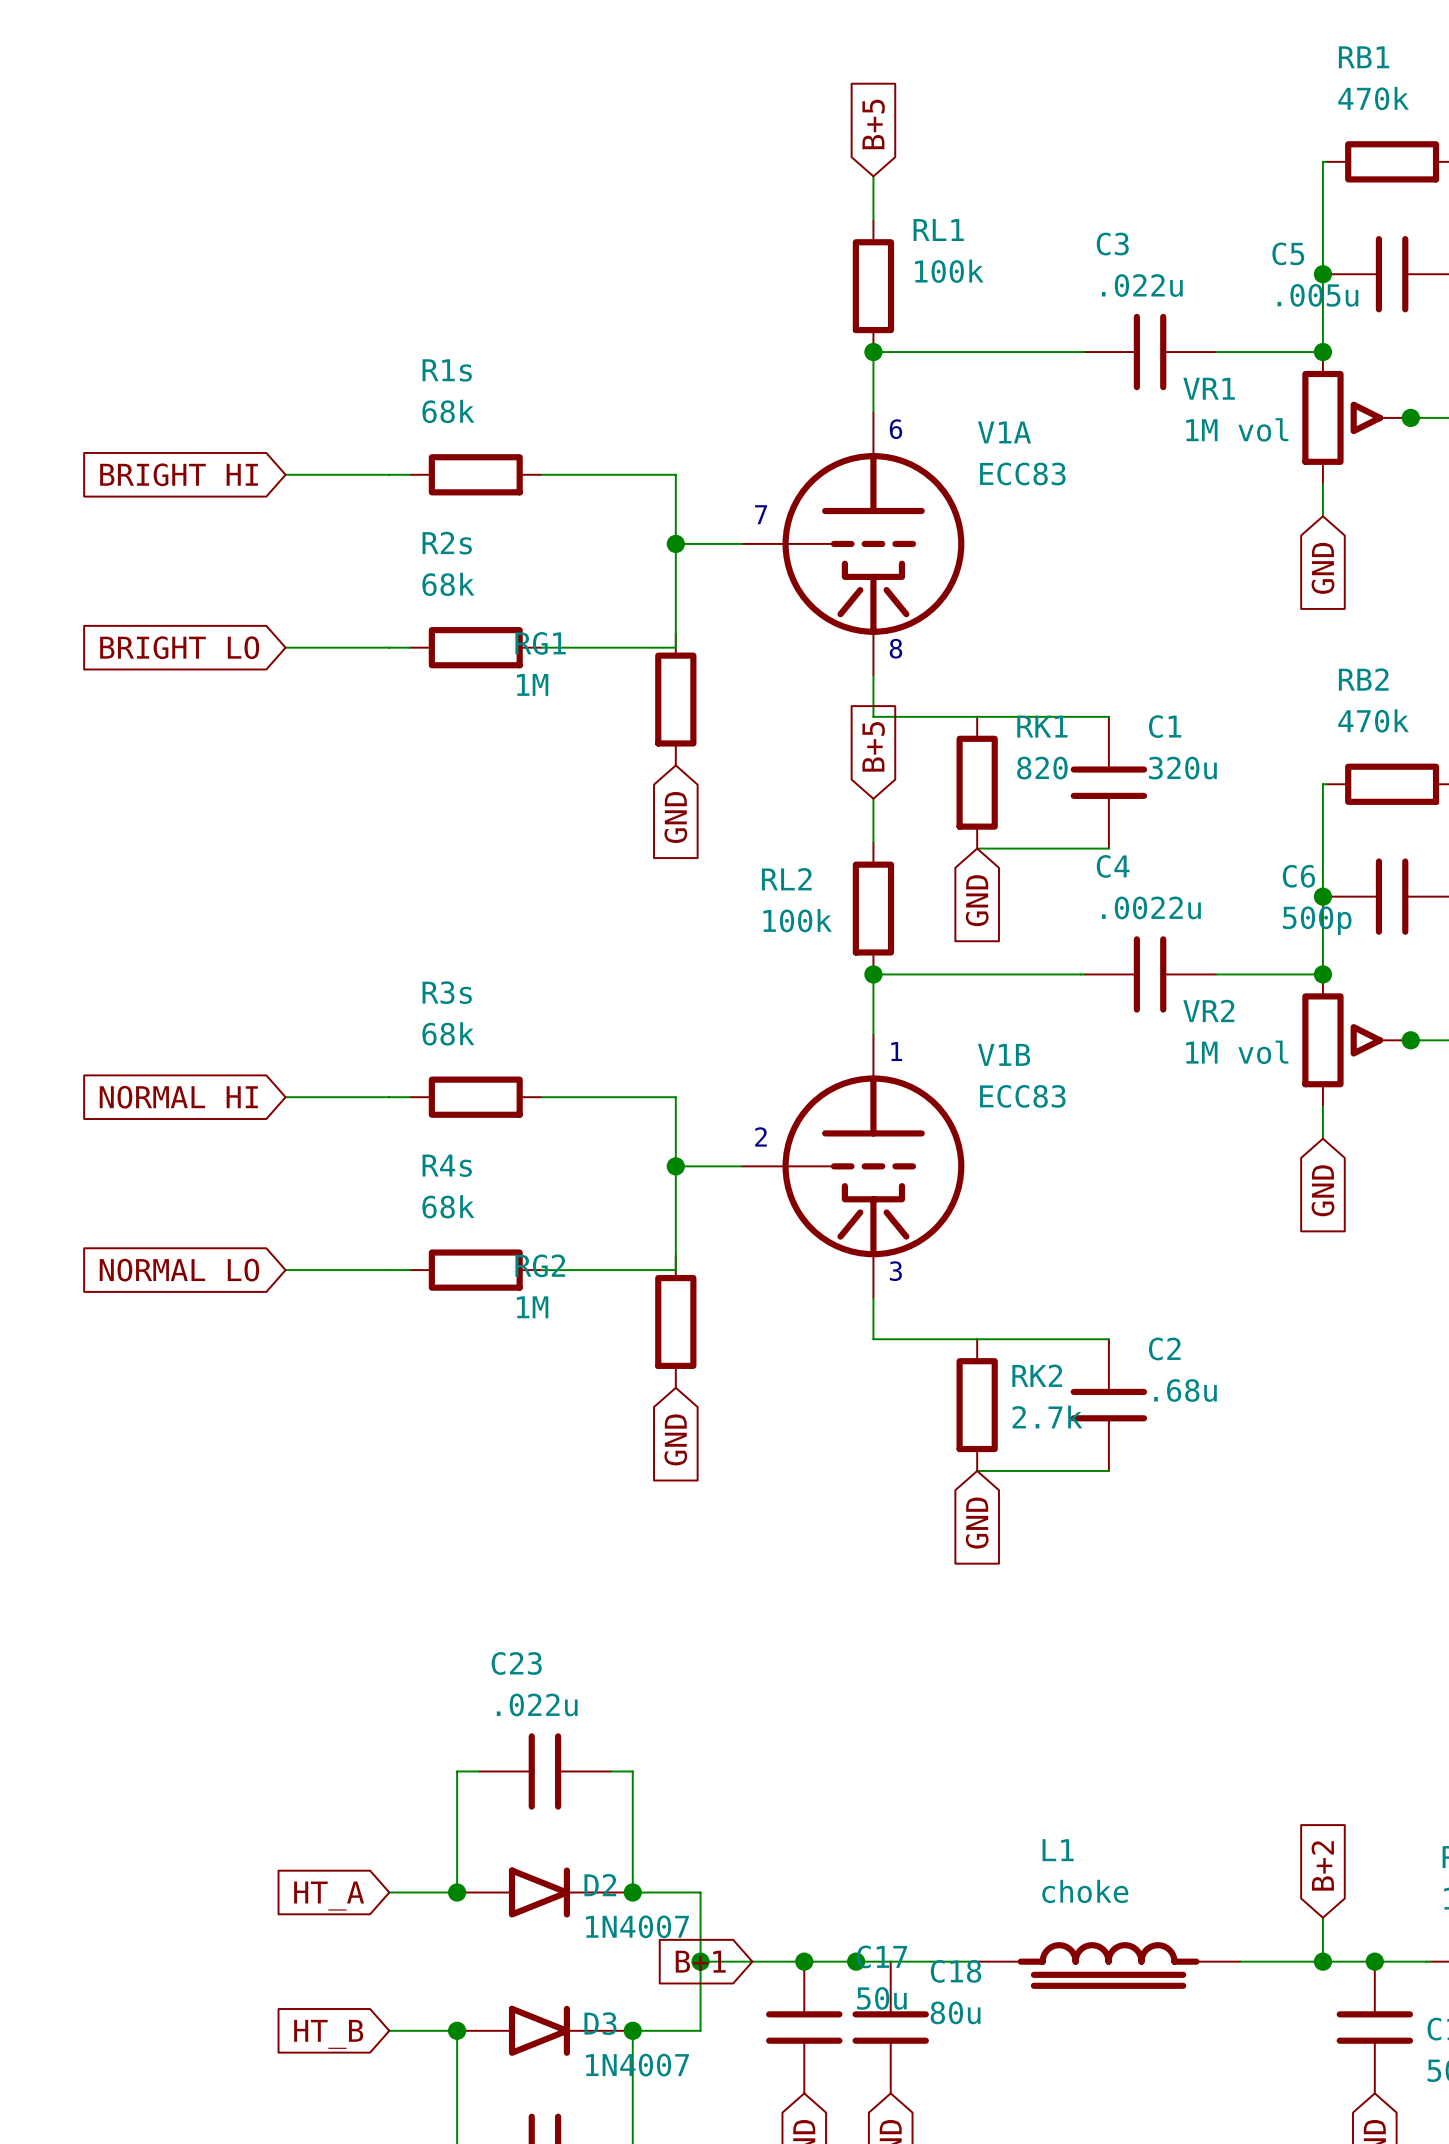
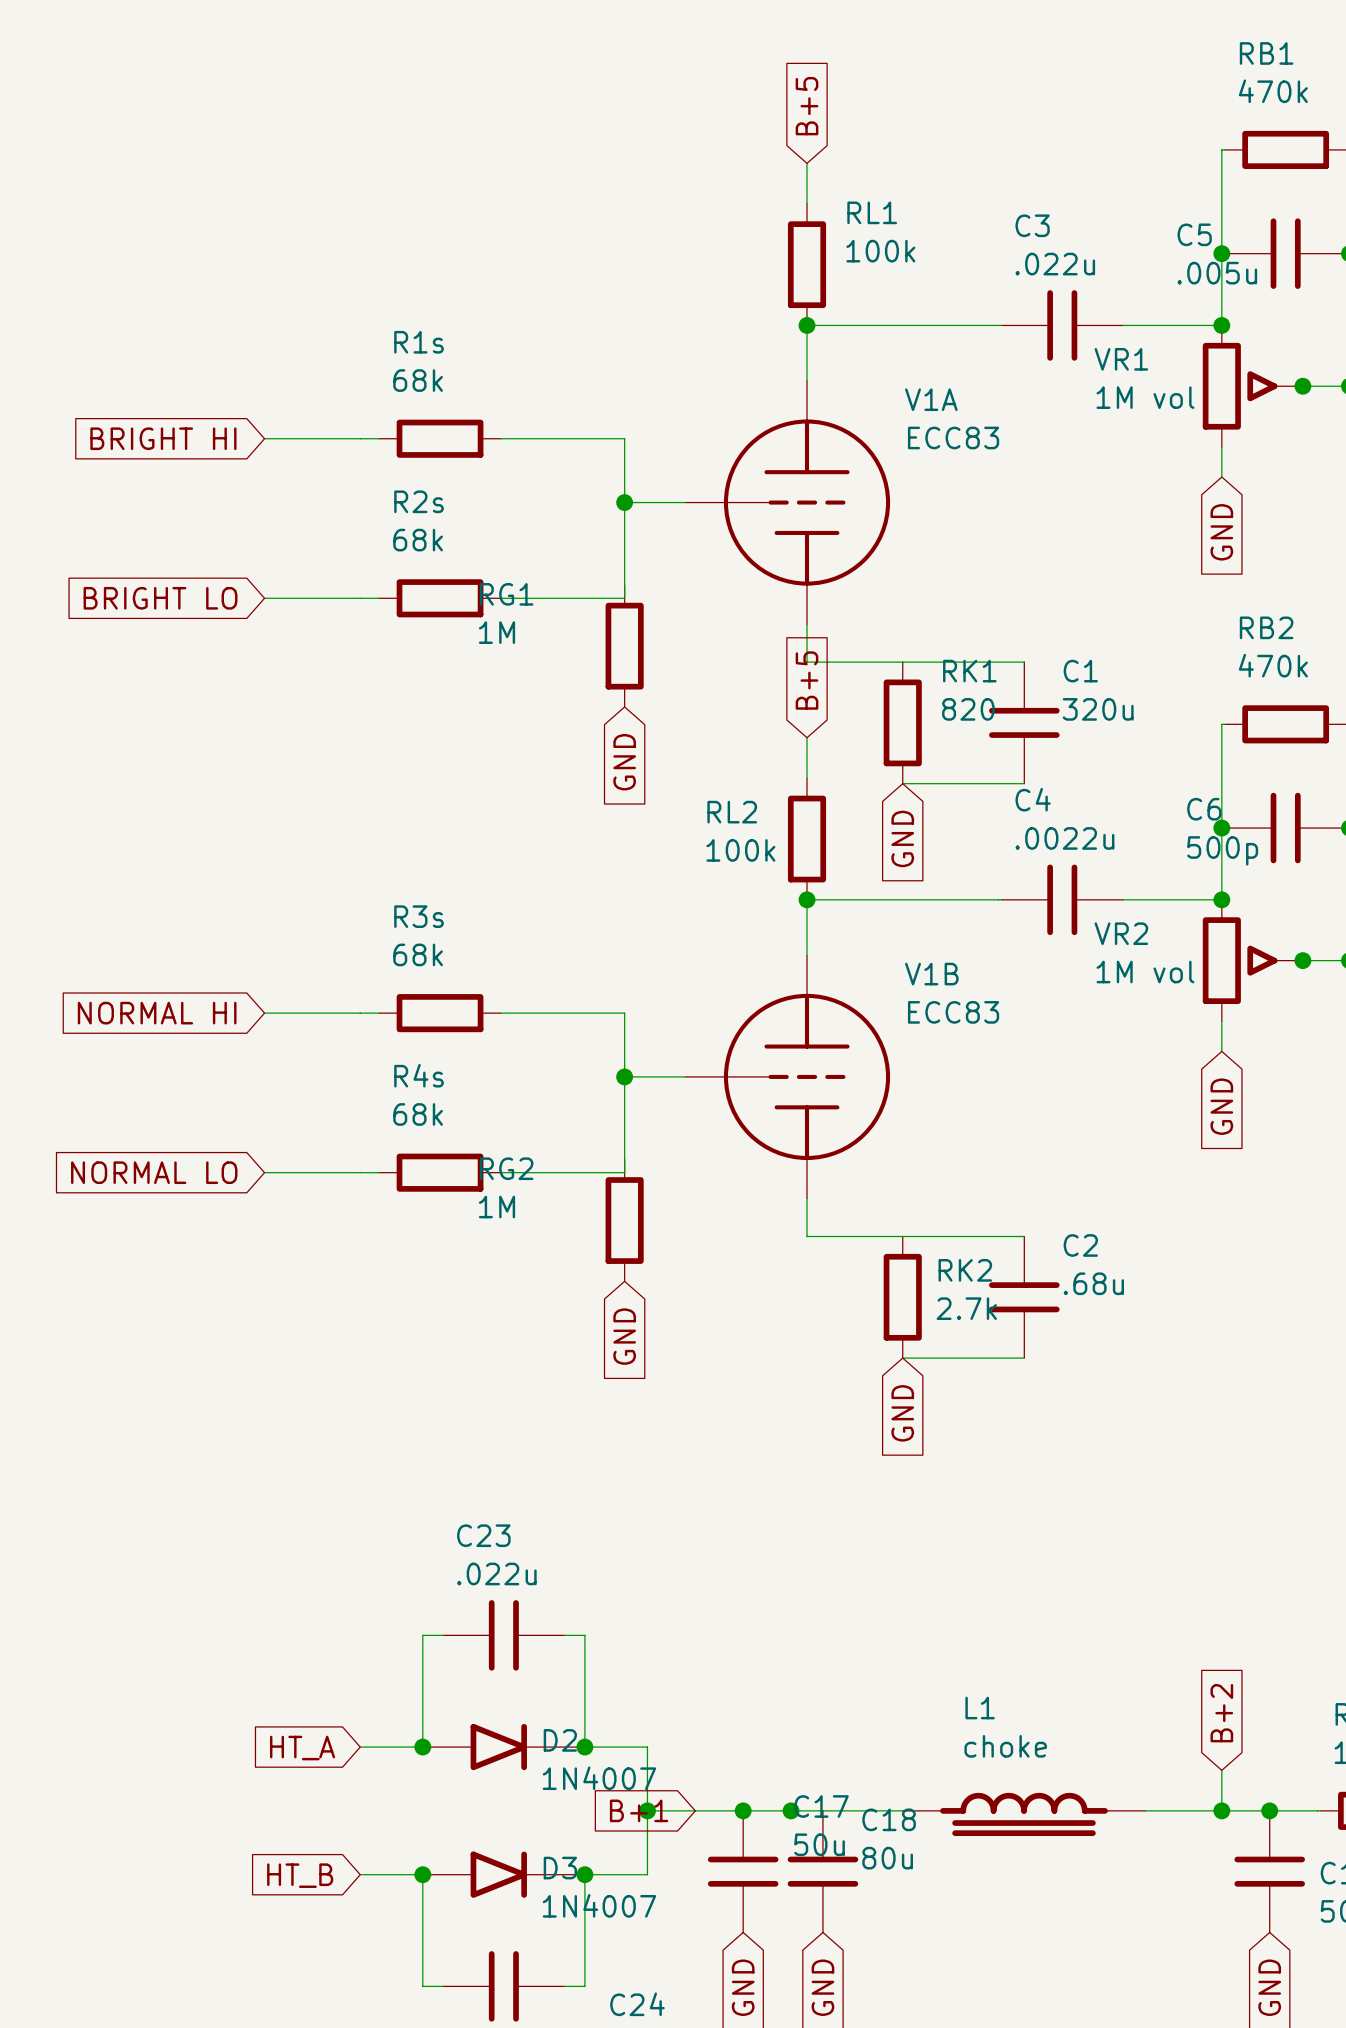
V1A symbol: [741, 412, 965, 676] -> [685, 380, 891, 625]
text: 6 (895, 429) -> none
text: 7 (761, 514) -> none
text: 8 (895, 648) -> none
V1B symbol: [741, 1034, 965, 1299] -> [685, 955, 891, 1199]
text: 1 (896, 1051) -> none
text: 2 (761, 1136) -> none
text: 3 (895, 1271) -> none

